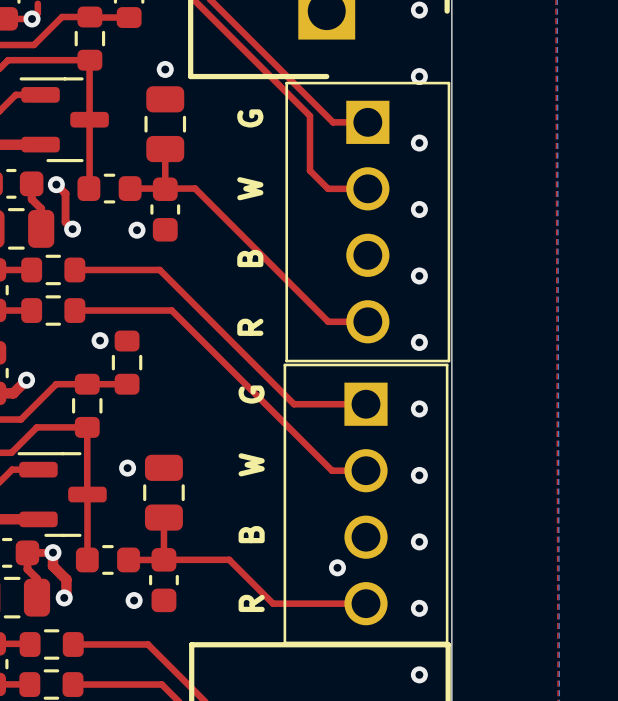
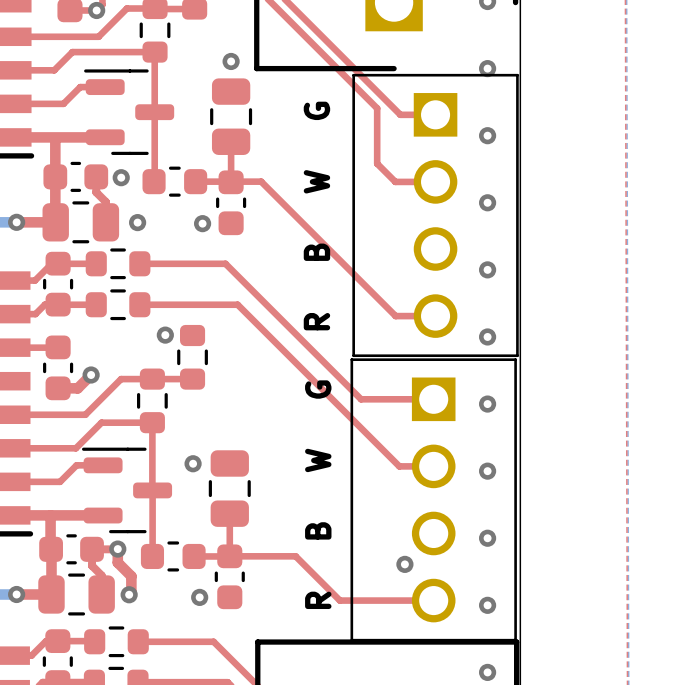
top track: (56, 184) (65, 193) (65, 222) (72, 229) -> none

